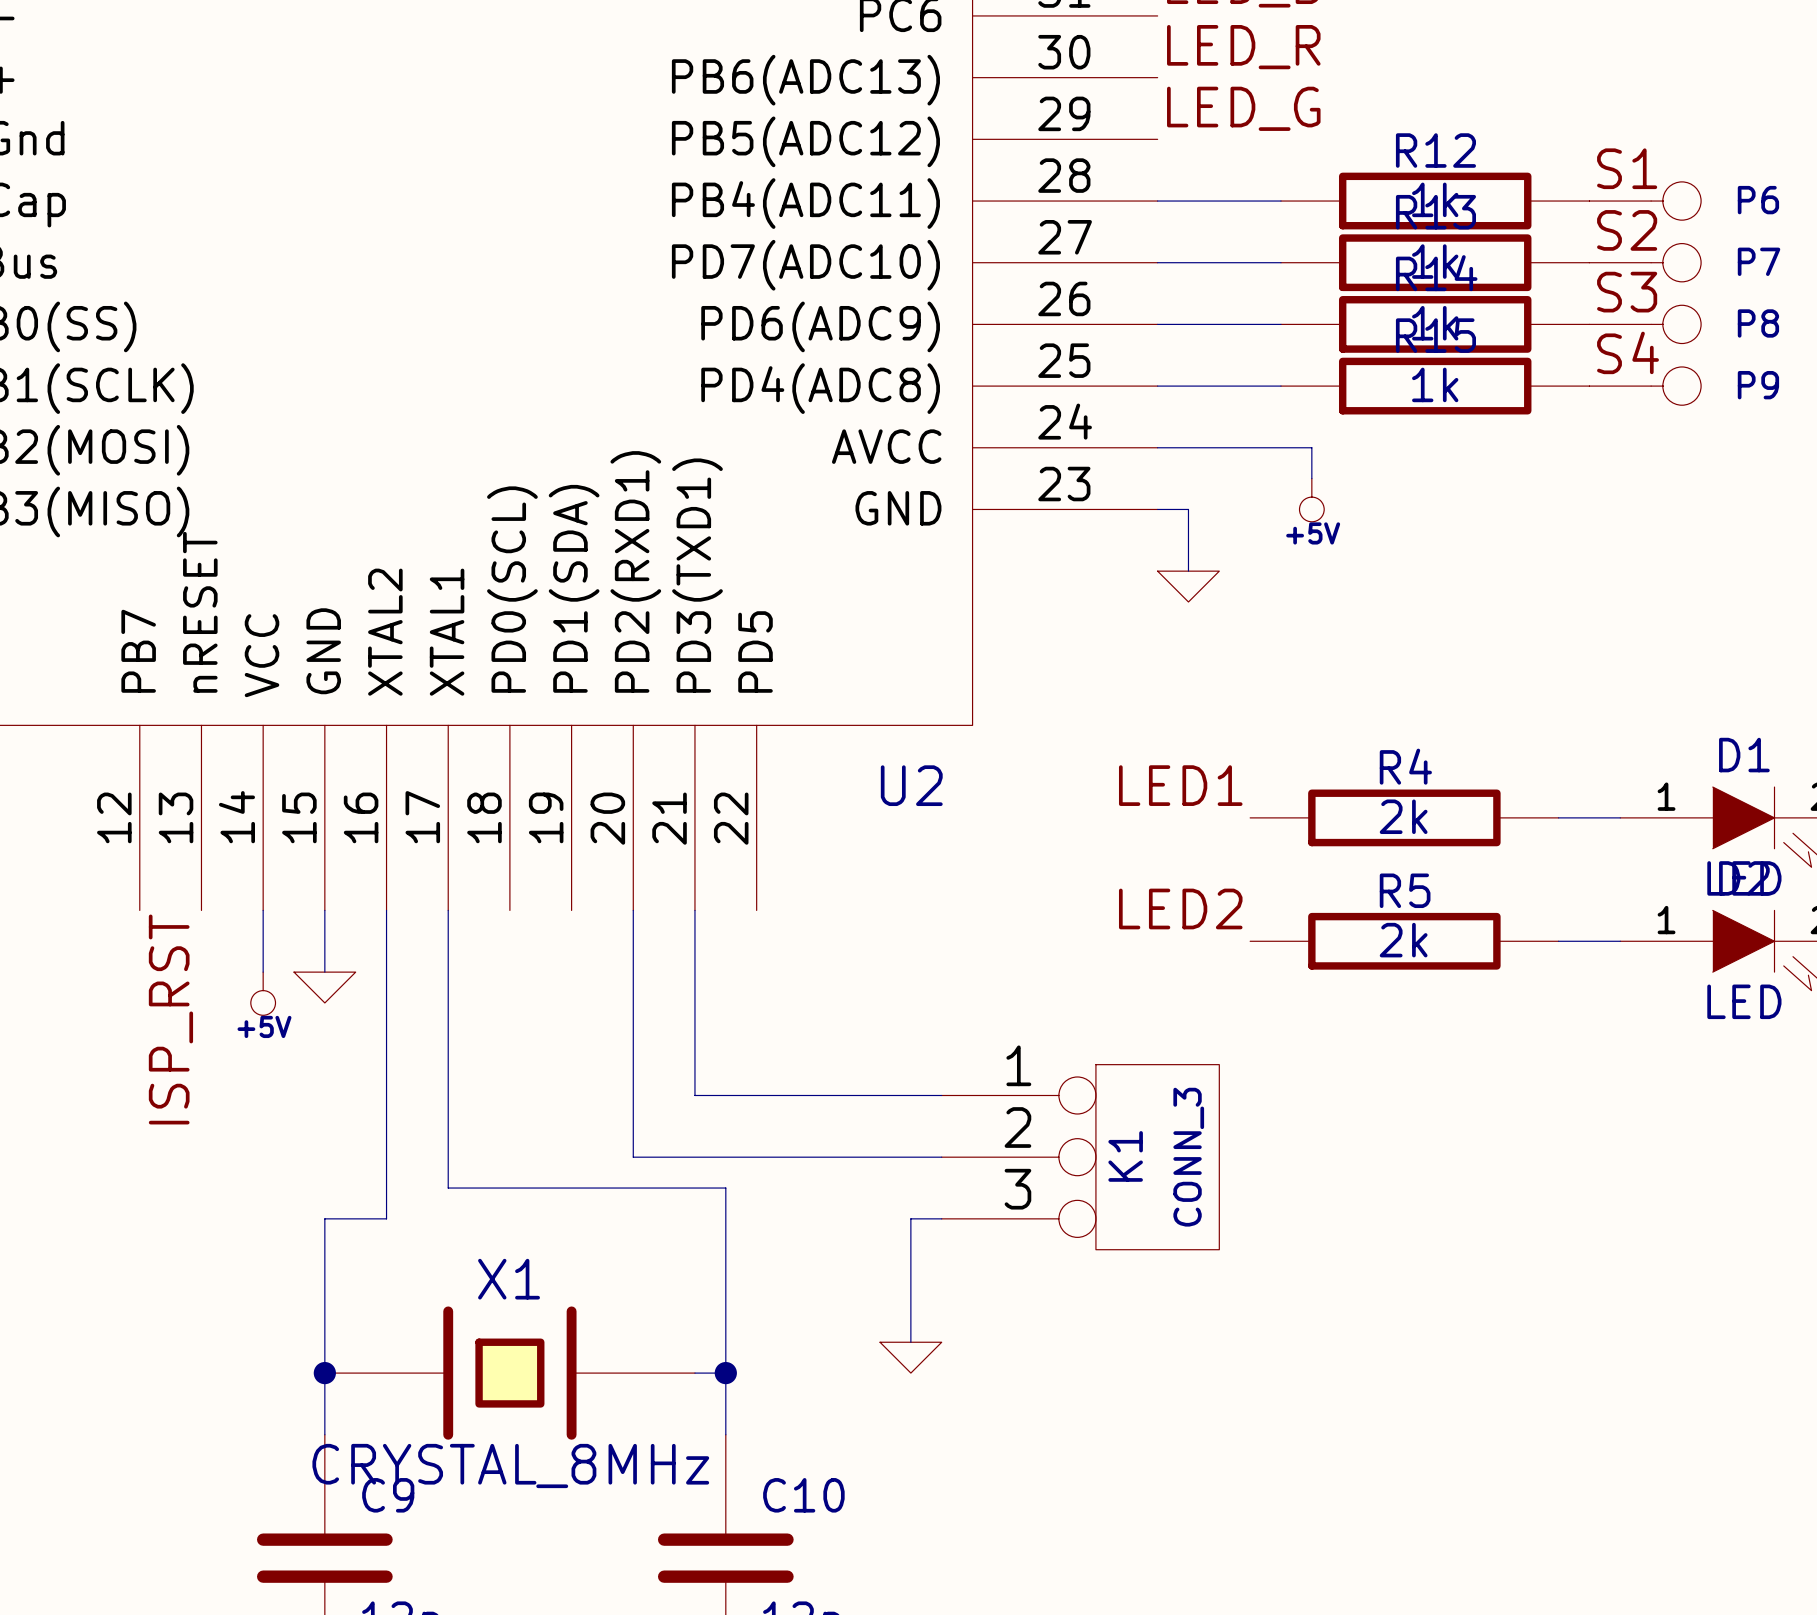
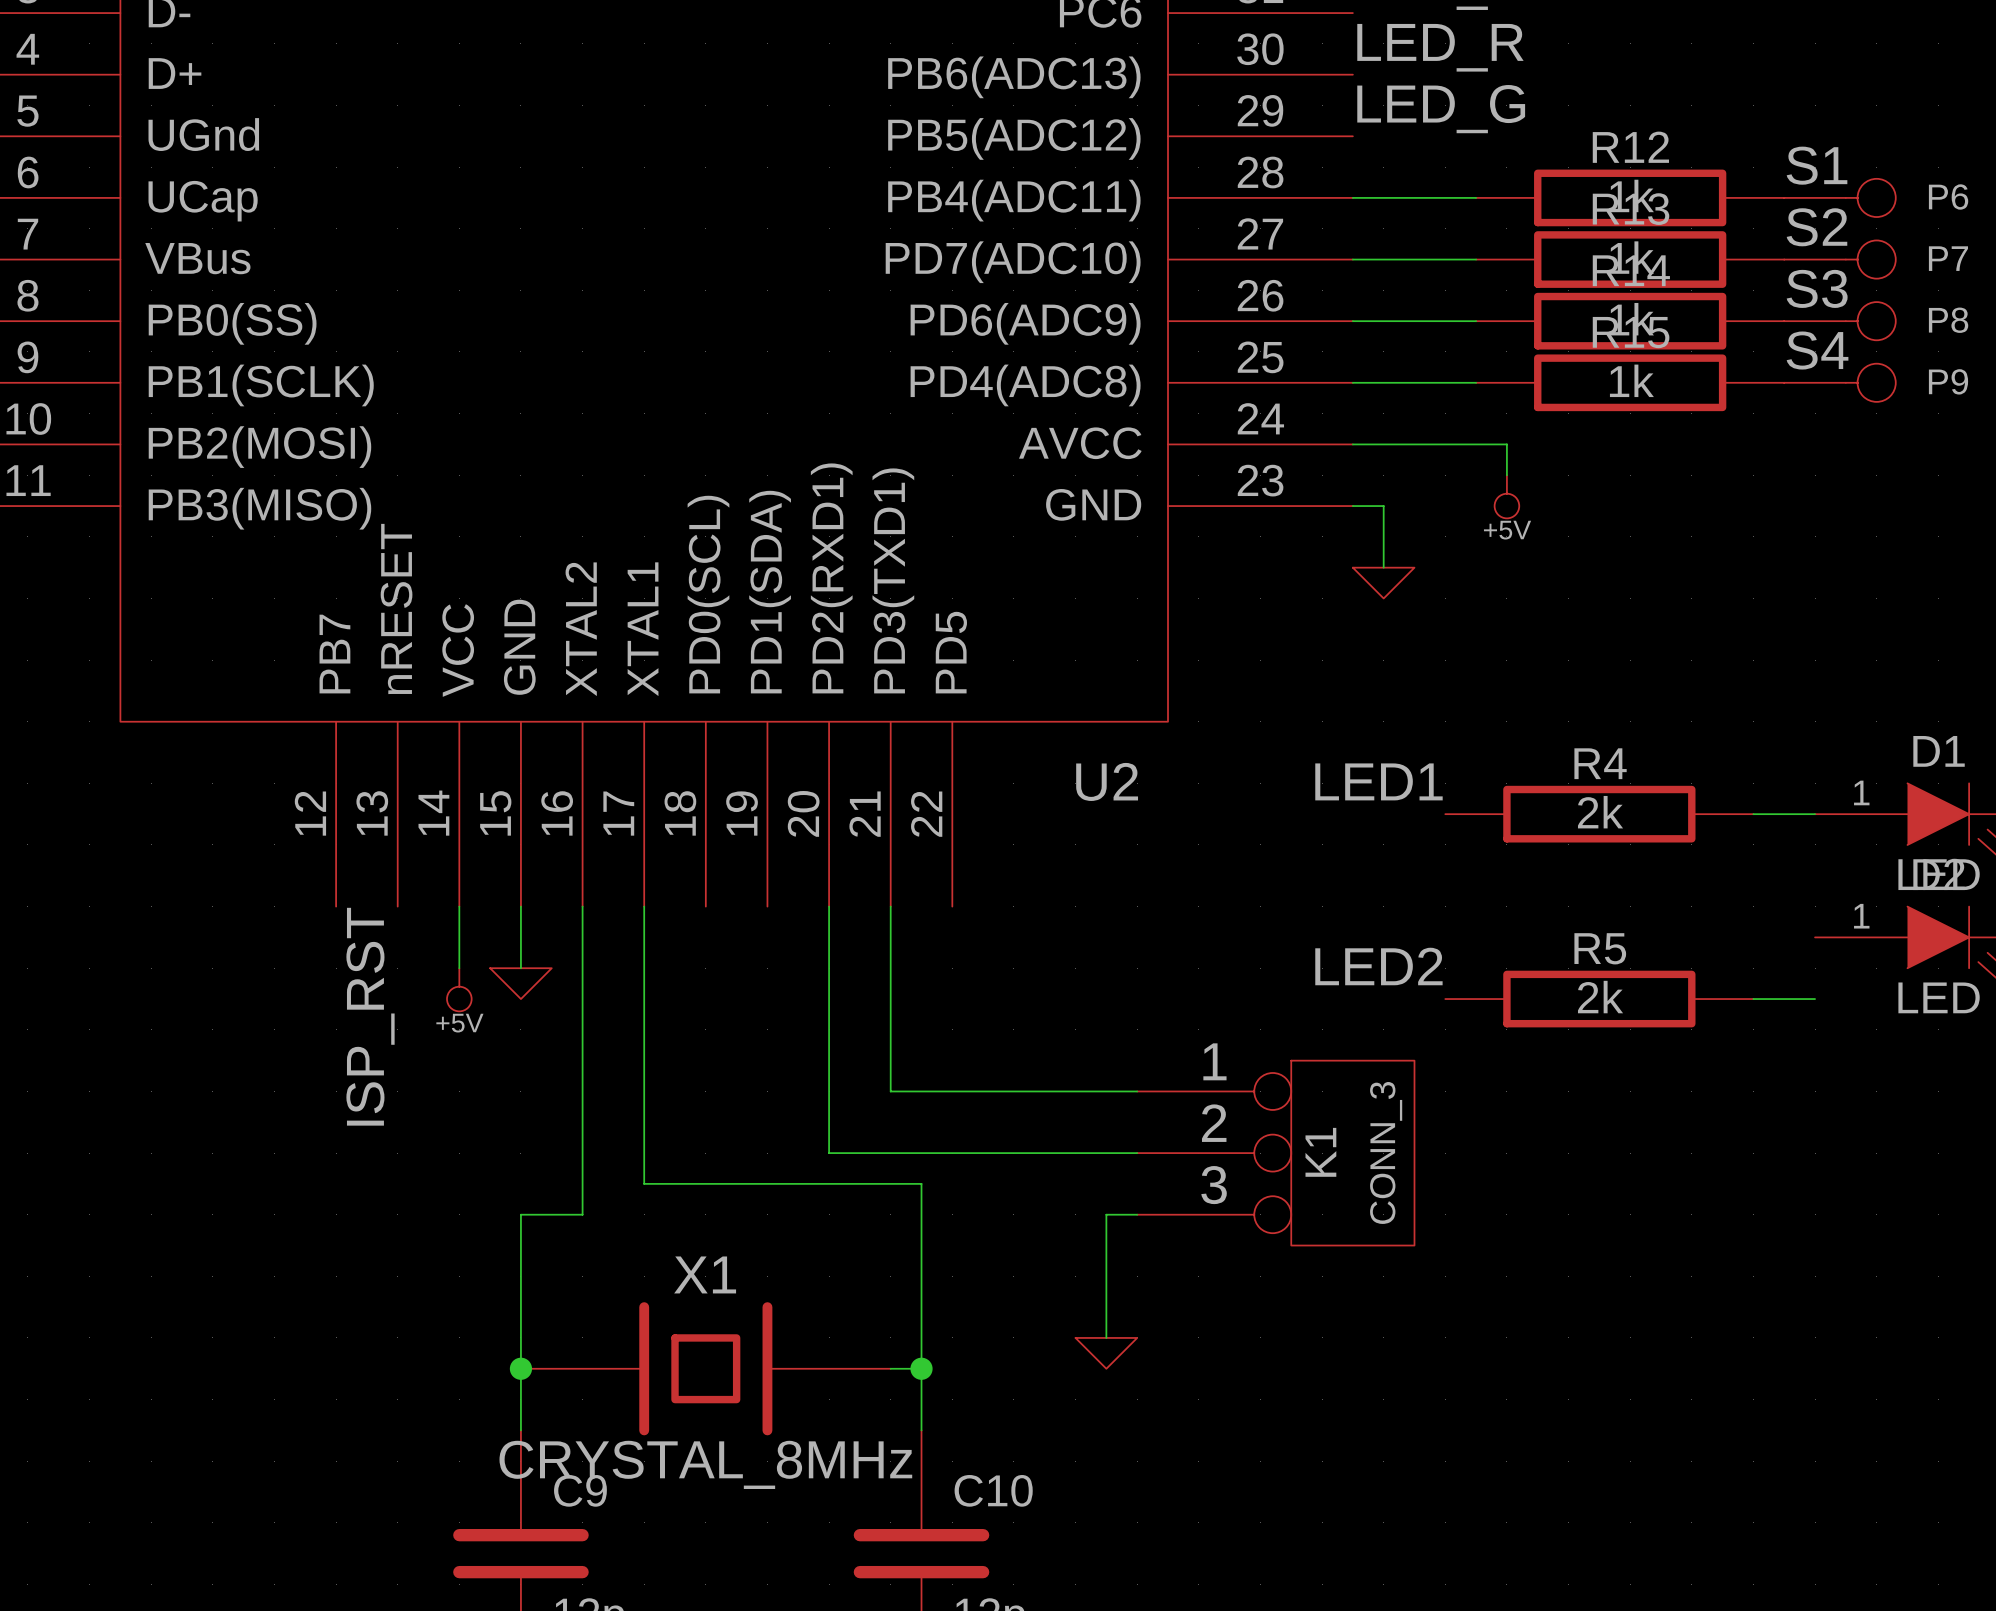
label position: LED2 (1180, 908) -> LED2 (1378, 966)
R5 position: (1404, 941) -> (1599, 999)
wire: (1558, 941) (1620, 941) -> (1753, 999) (1815, 999)

